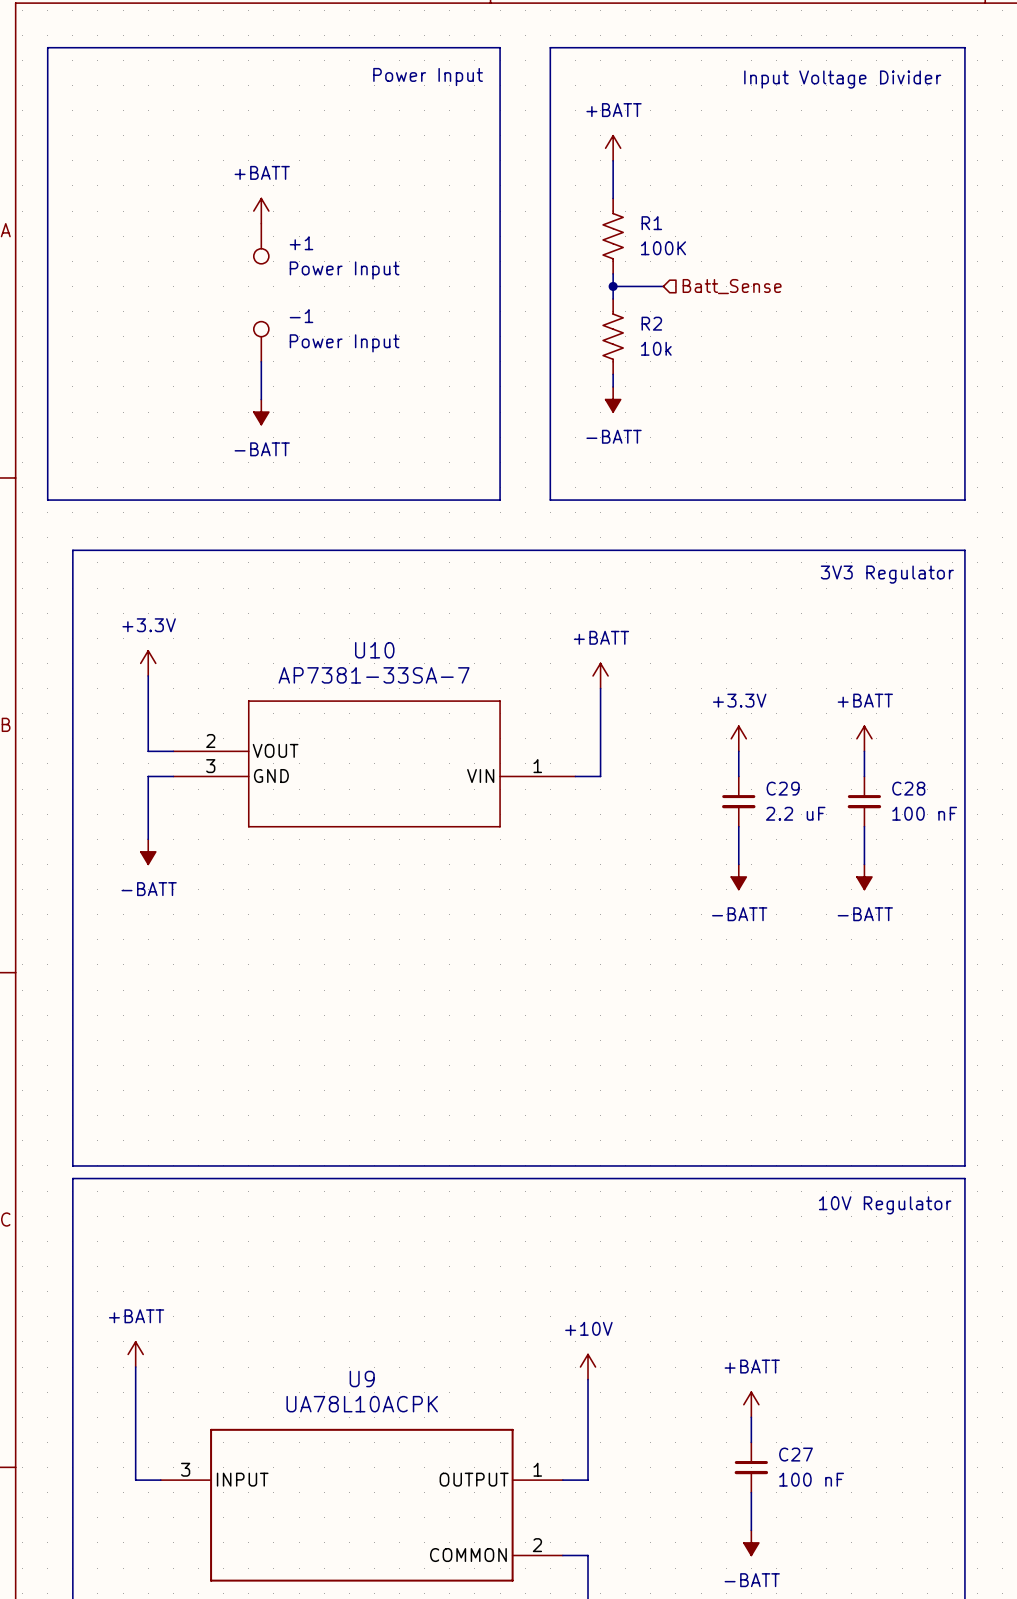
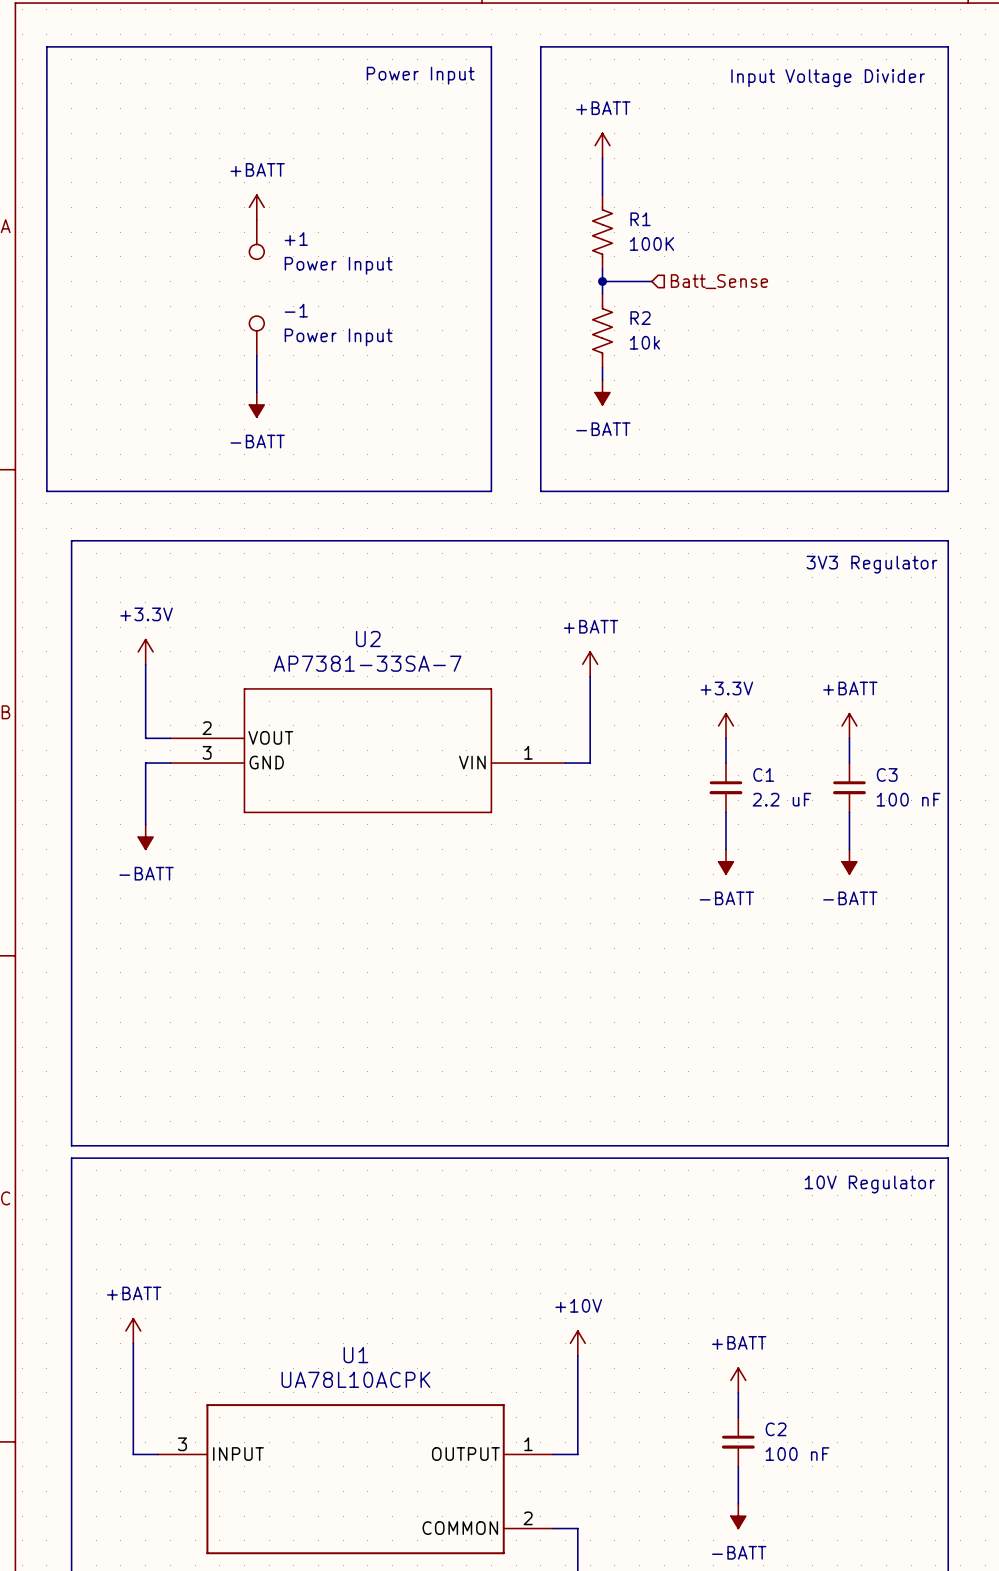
U10 name: U10 (374, 650) -> U2 (368, 639)
C29 name: C29 (783, 788) -> C1 (763, 774)
C28 name: C28 (908, 788) -> C3 (887, 774)
U9 name: U9 (362, 1379) -> U1 (355, 1355)
C27 name: C27 (796, 1454) -> C2 (776, 1429)

